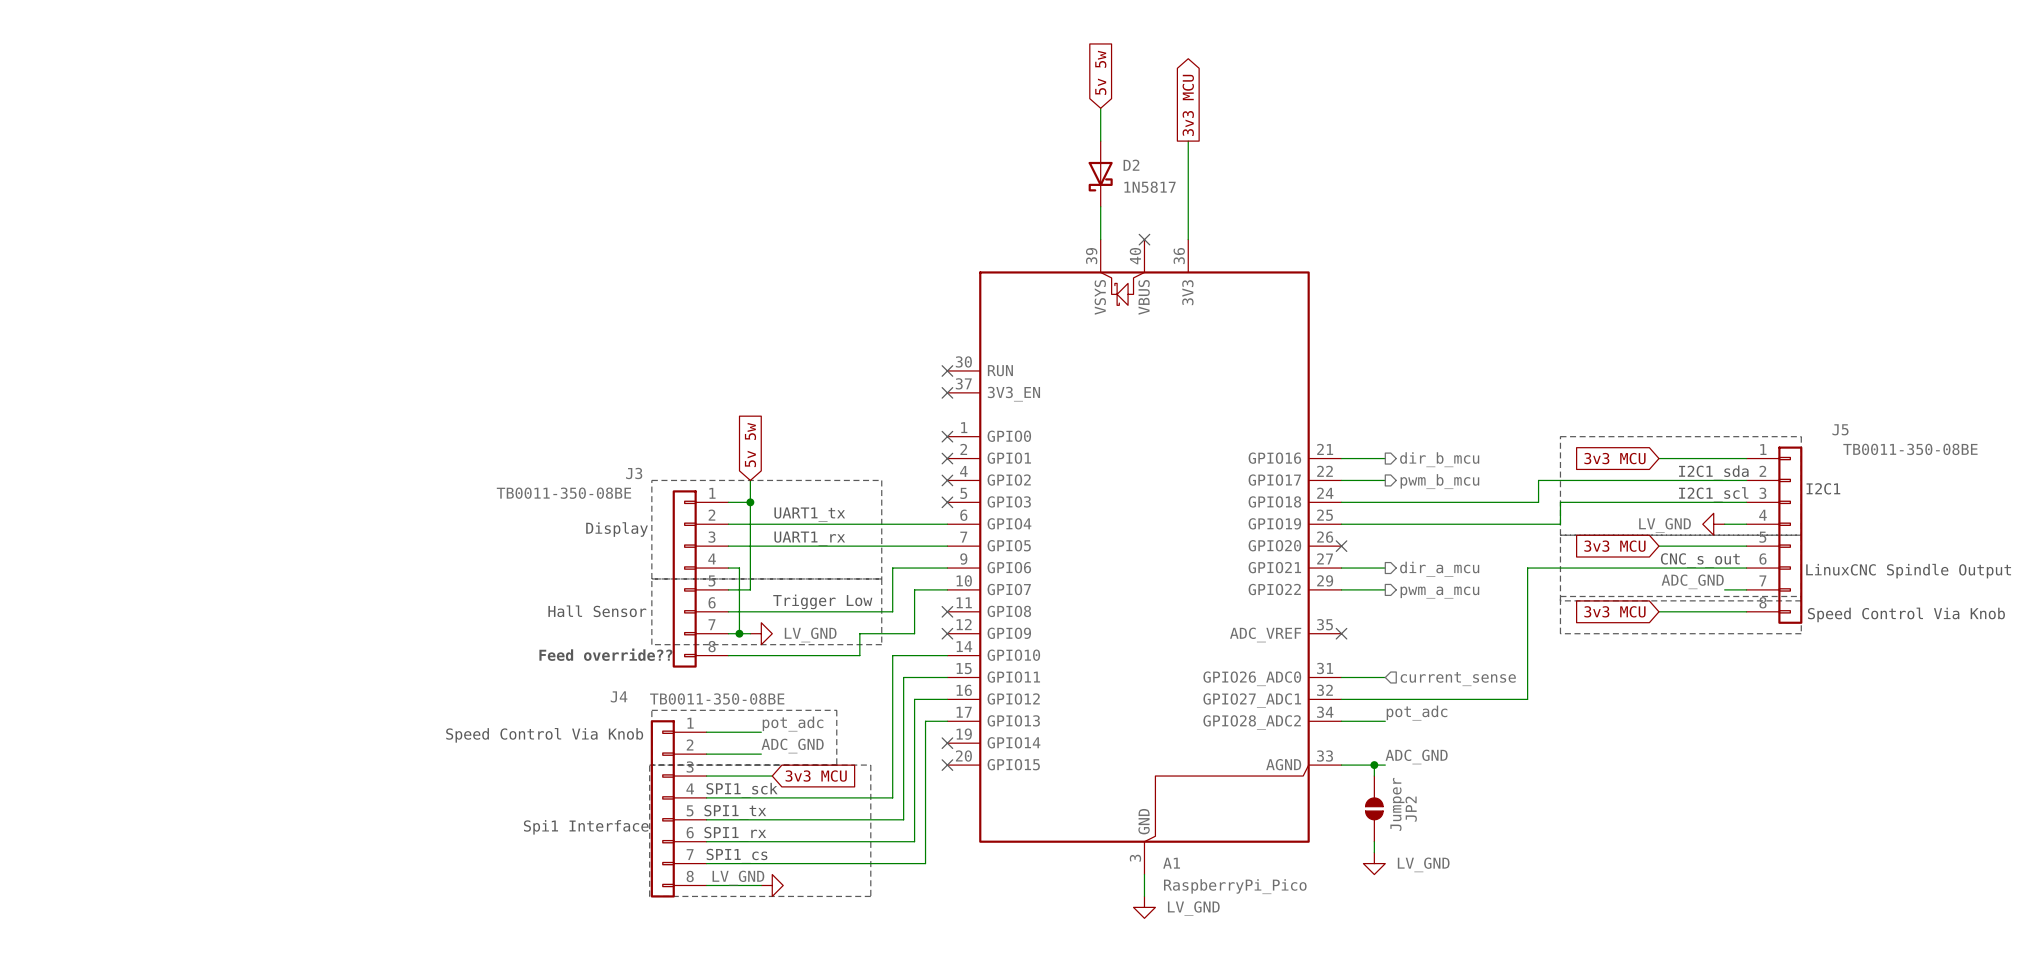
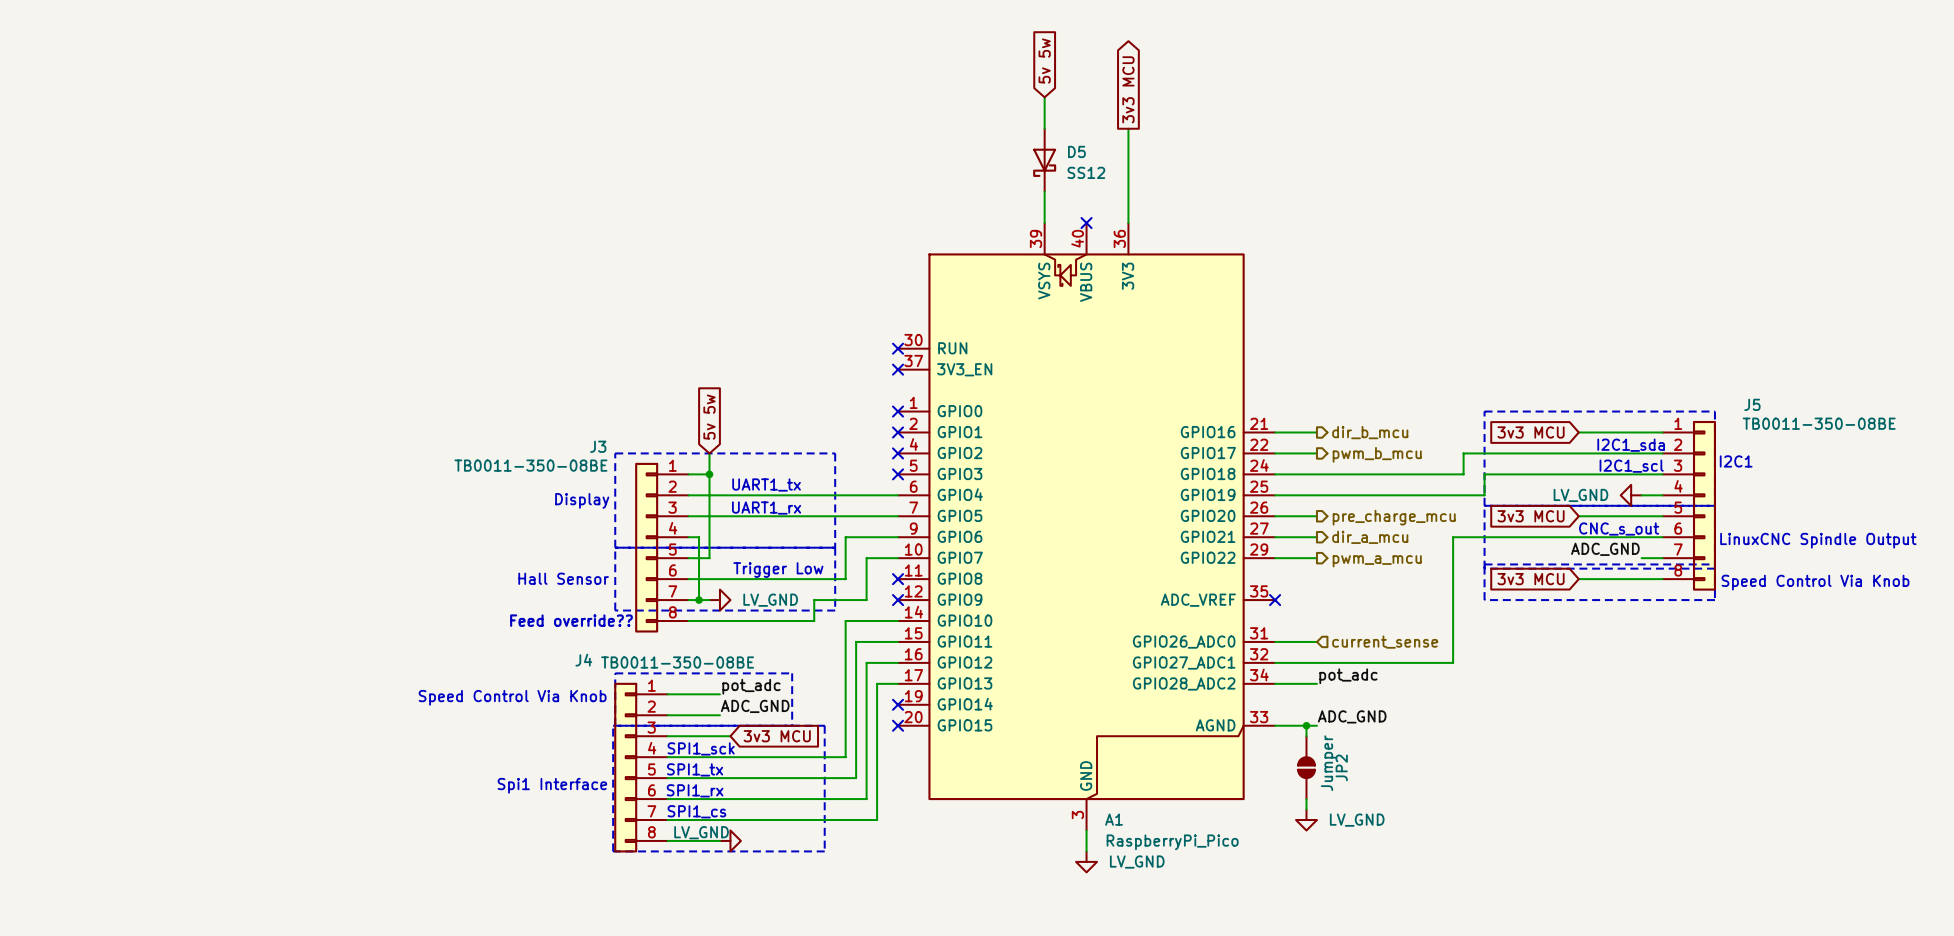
D2 name: D2 (1131, 165) -> D5 (1076, 151)
D2 value: 1N5817 (1150, 187) -> SS12 (1086, 172)
wire: none -> (1275, 516) (1316, 516)
no-connect mark: (1341, 546) -> none
hierarchical label: none -> pre_charge_mcu (1394, 517)

